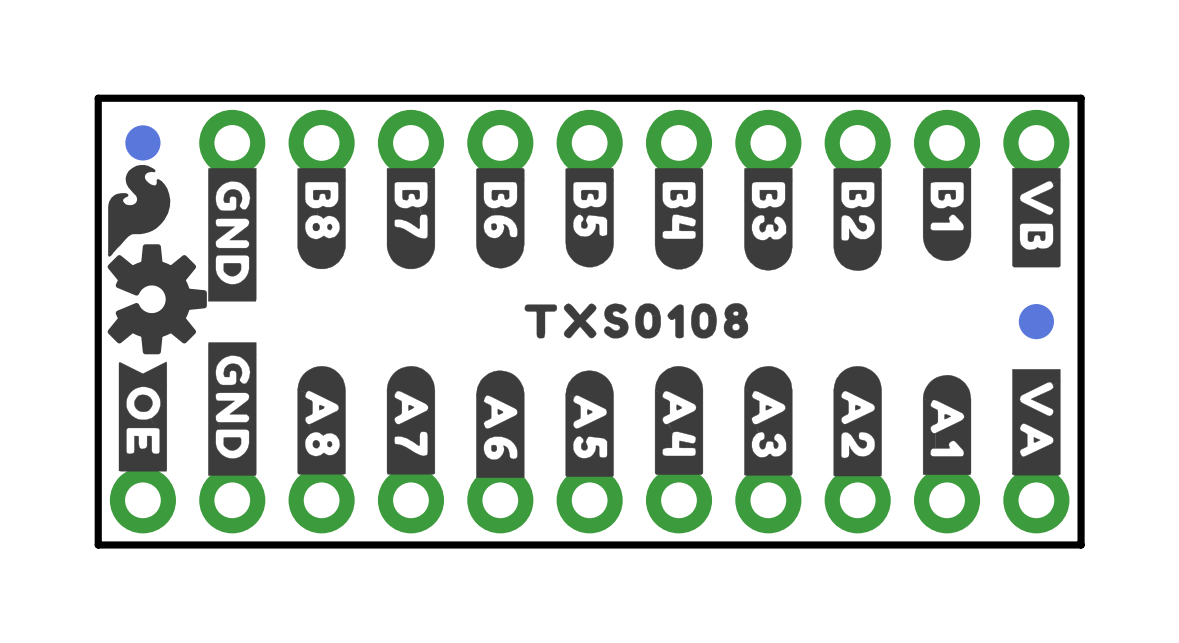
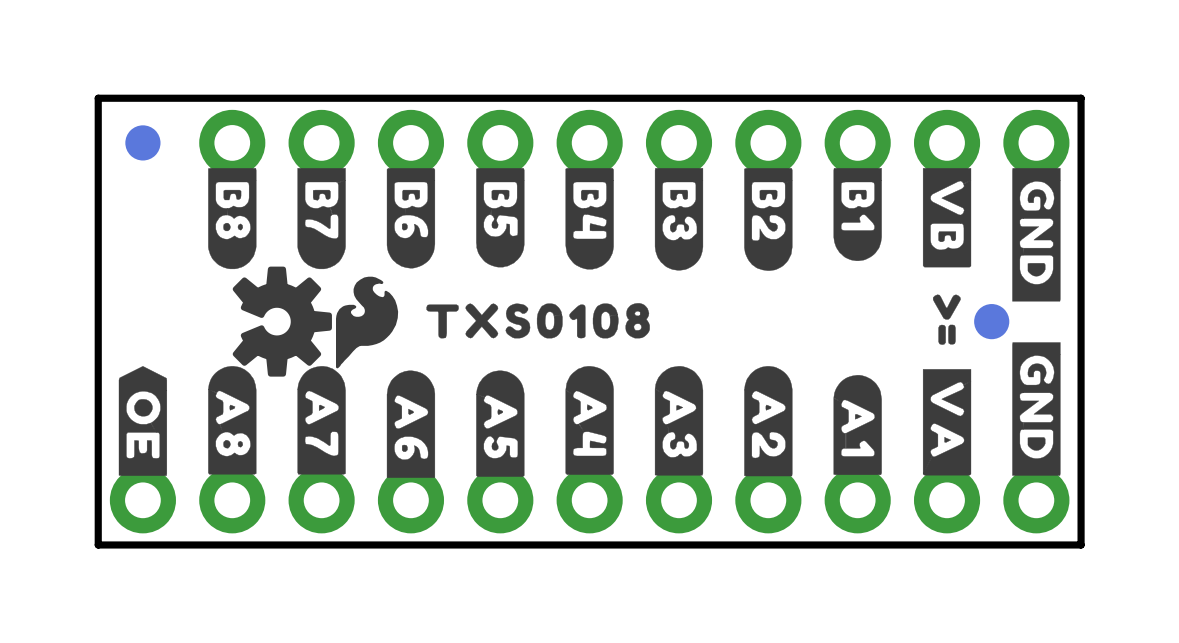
drawing: [208, 168, 257, 476] -> none
drawing: none -> [1012, 168, 1061, 476]
drawing position: (139, 210) -> (367, 322)
drawing position: (947, 214) -> (857, 214)
drawing position: (589, 217) -> (500, 217)
drawing position: (1036, 217) -> (947, 217)
drawing position: (321, 218) -> (232, 218)
drawing position: (410, 218) -> (321, 218)
drawing position: (500, 218) -> (410, 218)
drawing position: (679, 218) -> (589, 218)
drawing position: (768, 219) -> (679, 219)
drawing position: (857, 219) -> (768, 219)
drawing: none -> [933, 294, 961, 345]
drawing position: (157, 299) -> (282, 321)
drawing position: (636, 320) -> (538, 320)
part position: (1036, 321) -> (991, 321)
drawing shape: [118, 361, 168, 472] -> [118, 366, 168, 476]
drawing position: (321, 420) -> (232, 420)
drawing position: (410, 420) -> (321, 420)
drawing position: (679, 420) -> (589, 420)
drawing position: (768, 420) -> (679, 420)
drawing position: (857, 421) -> (768, 421)
drawing position: (1036, 422) -> (947, 422)
drawing position: (589, 423) -> (500, 423)
drawing position: (500, 424) -> (410, 424)
drawing position: (947, 424) -> (857, 424)

